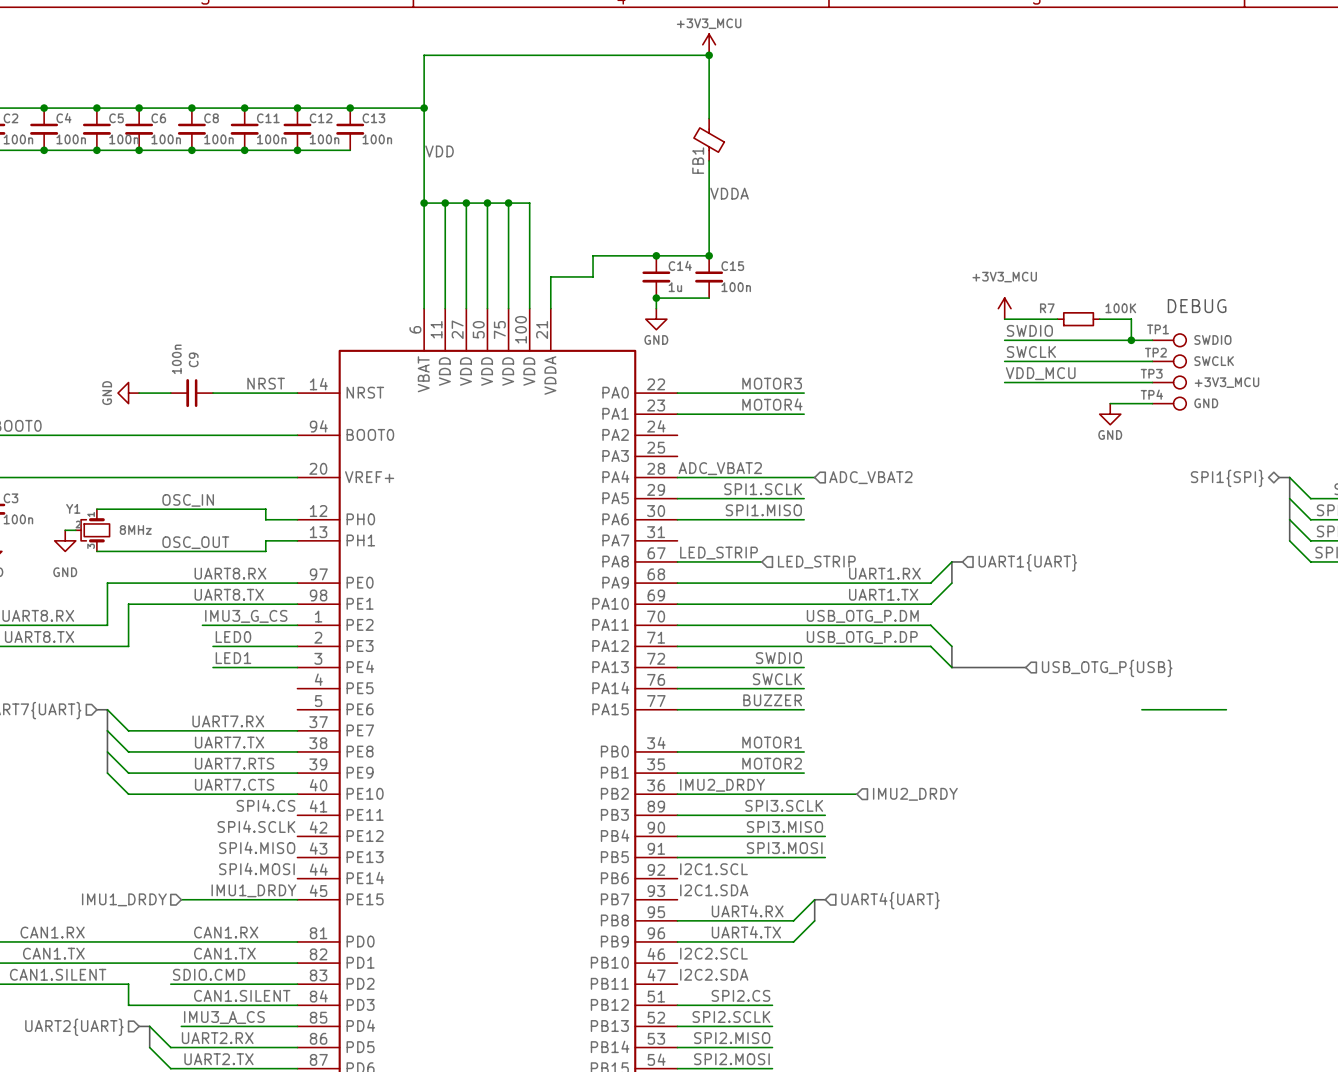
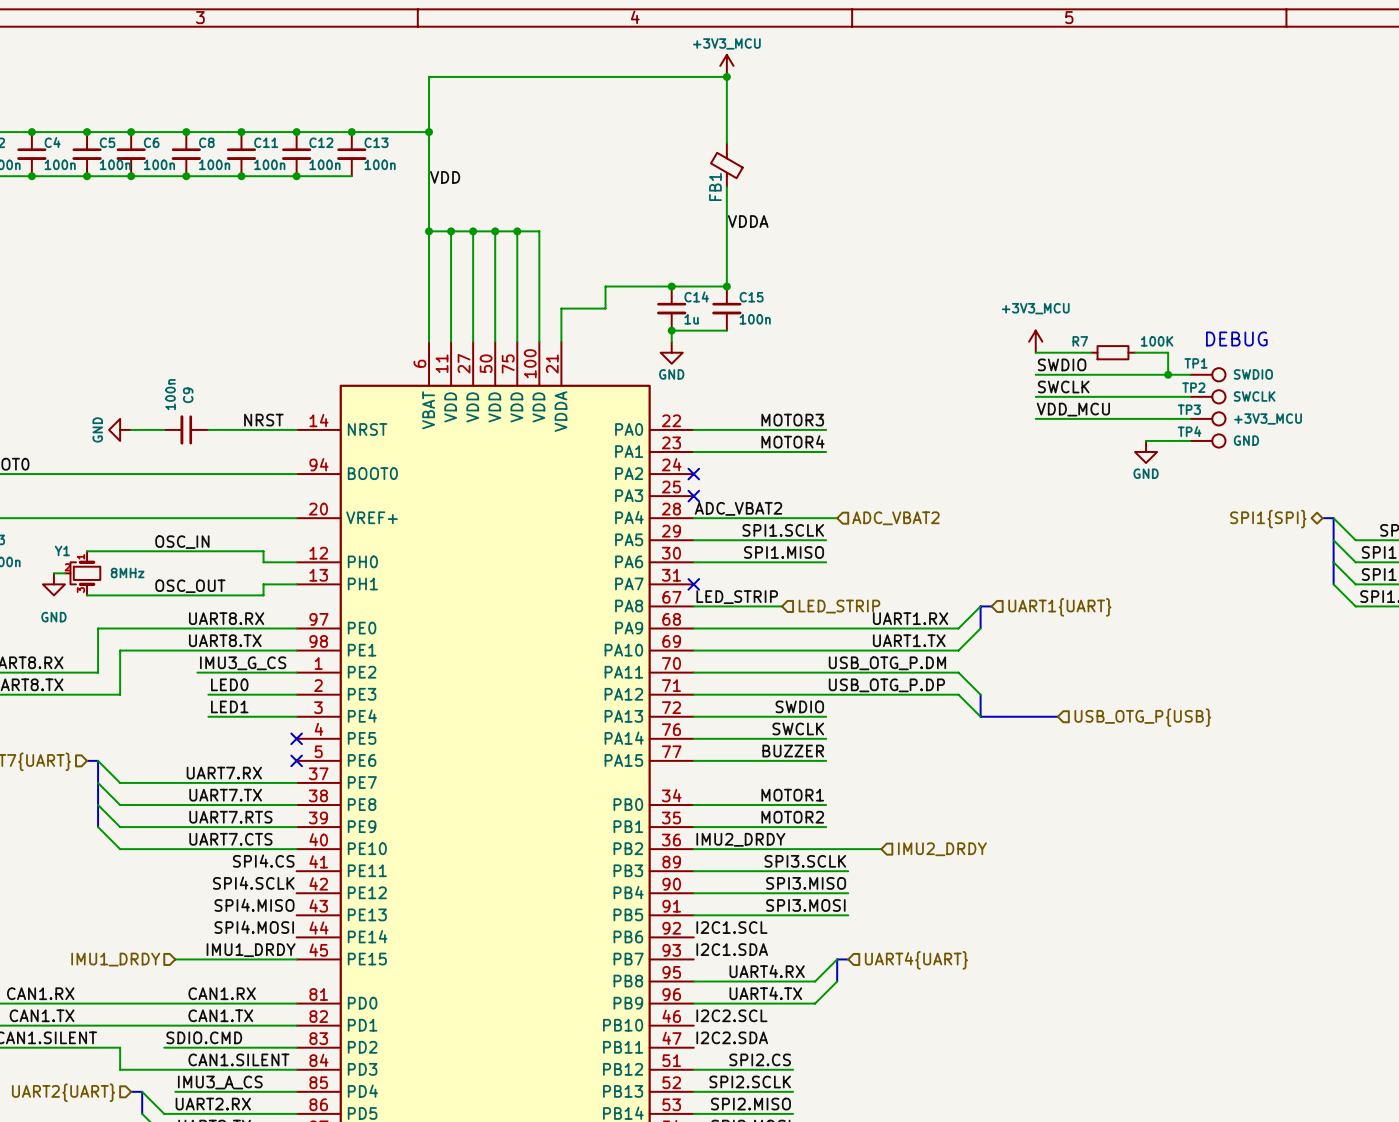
no-connect mark: none -> (693, 474)
no-connect mark: none -> (693, 496)
no-connect mark: none -> (693, 584)
no-connect mark: none -> (296, 738)
no-connect mark: none -> (296, 760)
wire: (1141, 709) (1226, 709) -> none

